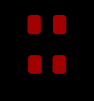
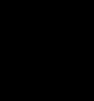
part: (46, 24) -> none
part: (47, 64) -> none

